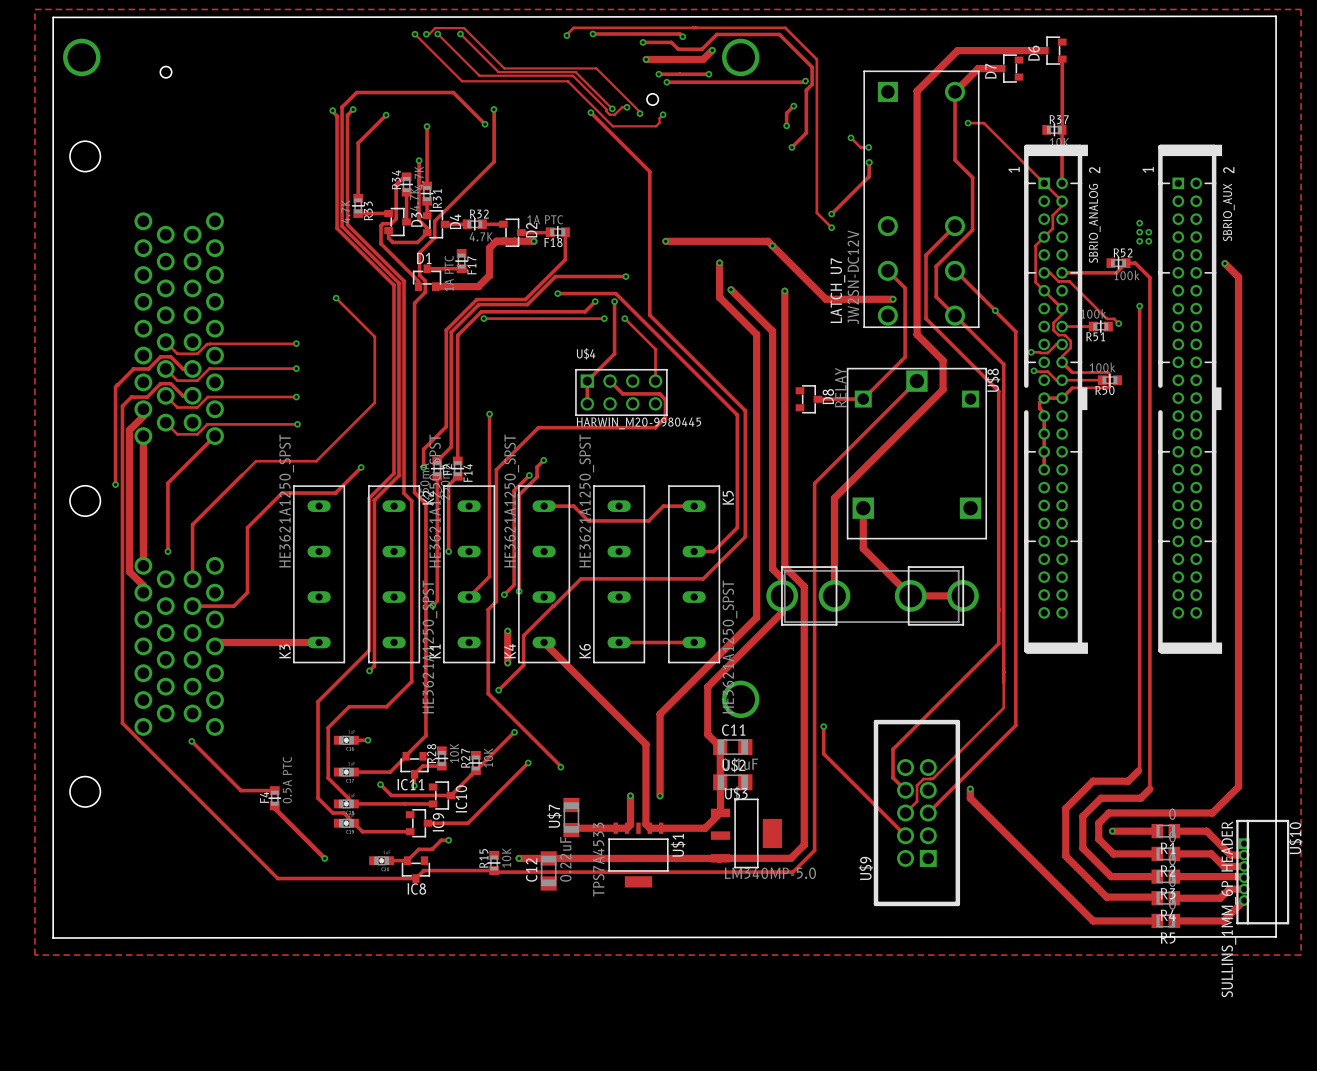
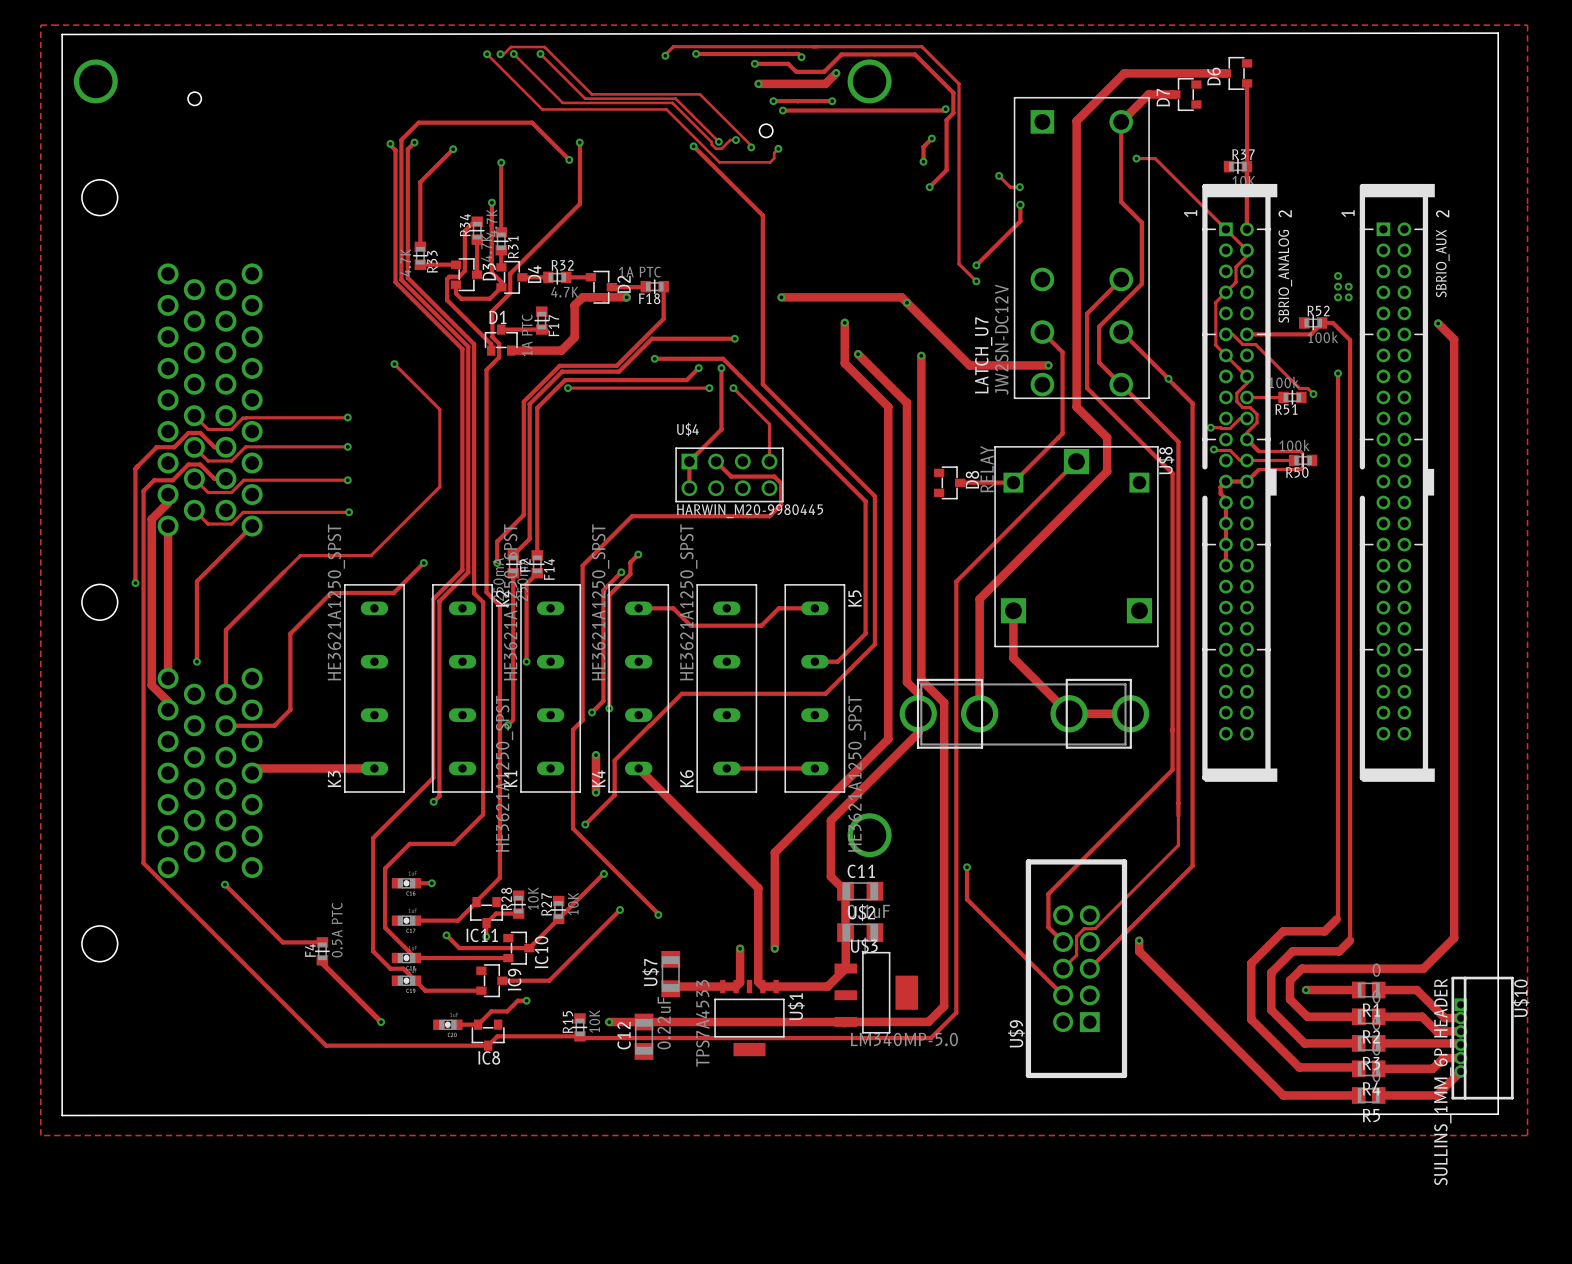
track: (489, 414) (489, 576) (469, 597) -> none
via: (489, 414) -> none

